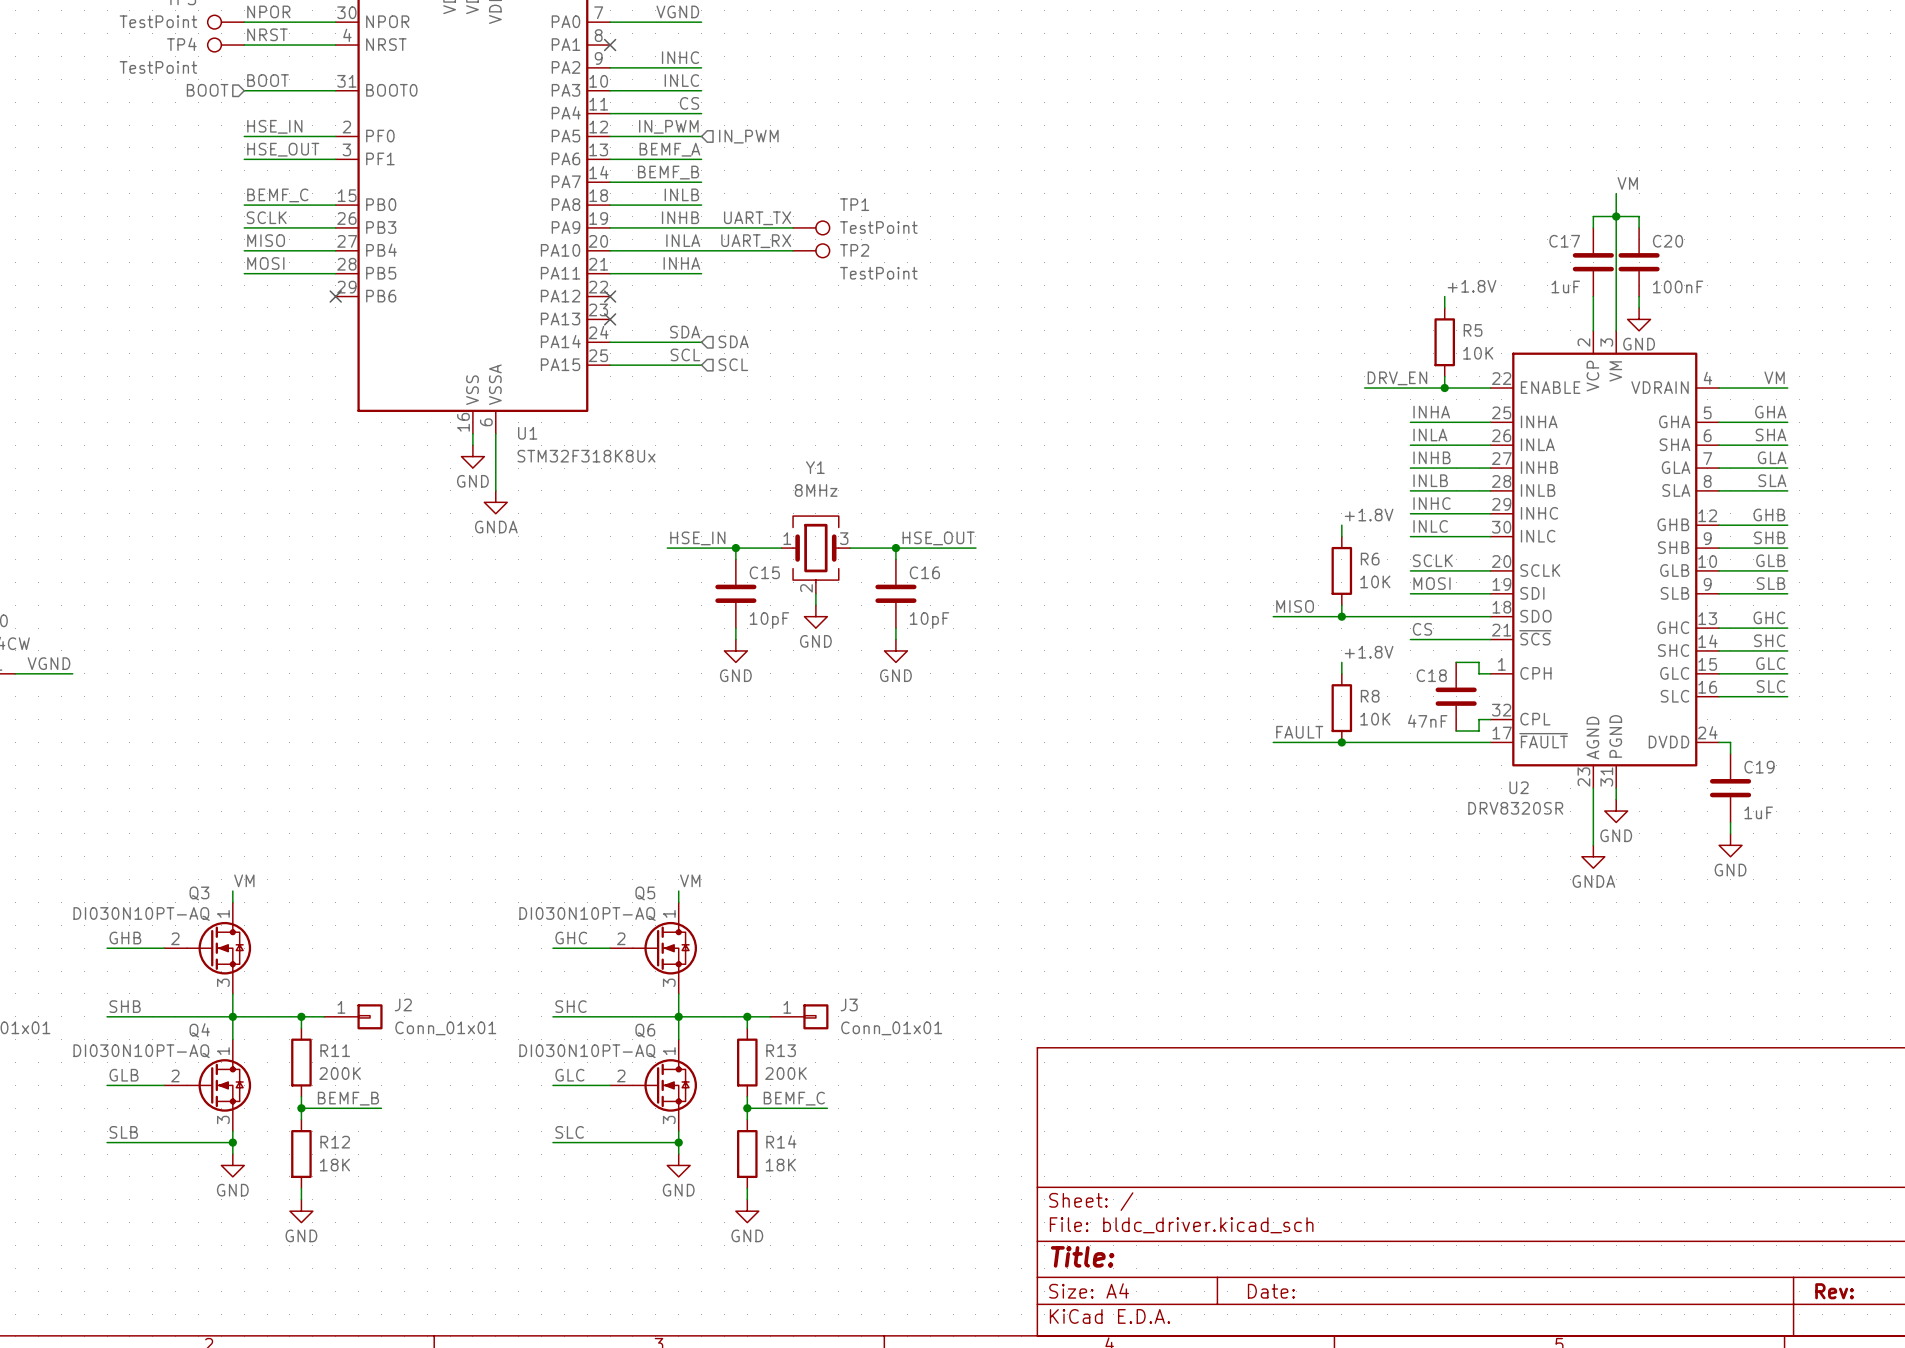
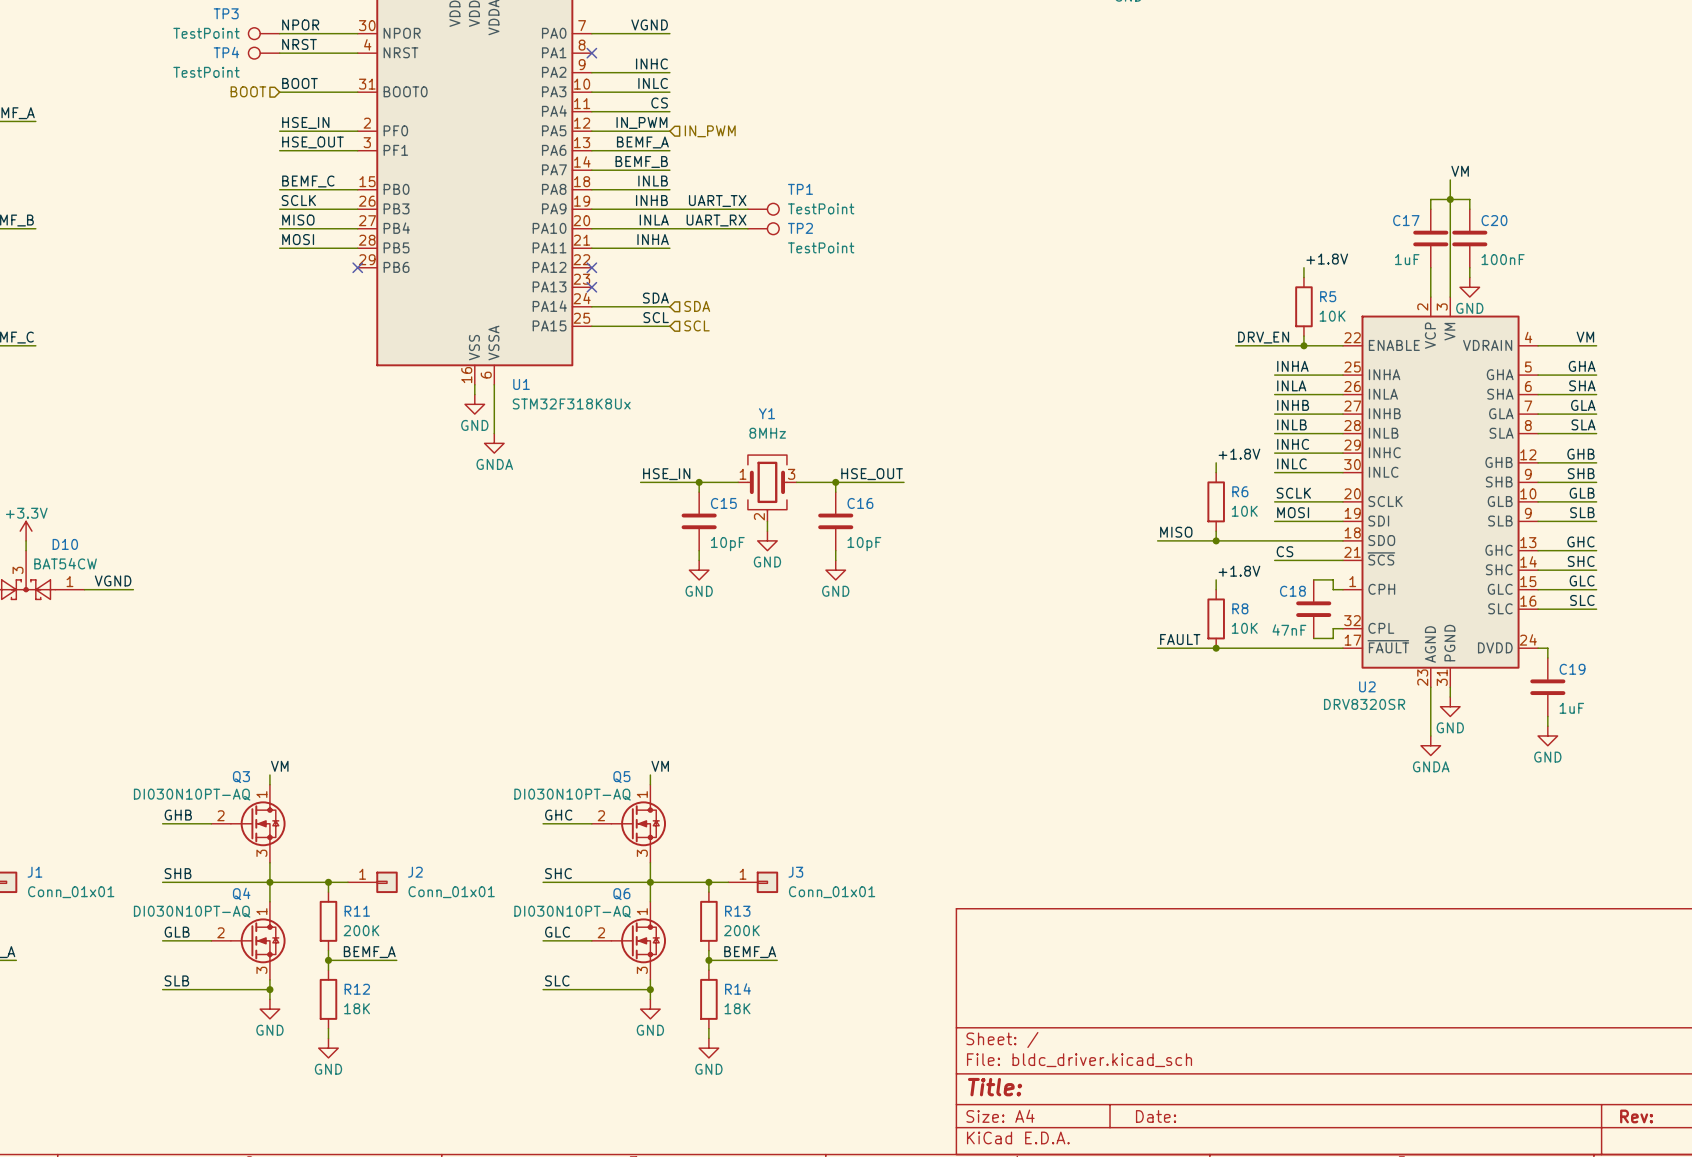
label: BEMF_B (348, 1098) -> BEMF_A (369, 952)
label: BEMF_C (794, 1098) -> BEMF_A (750, 952)

